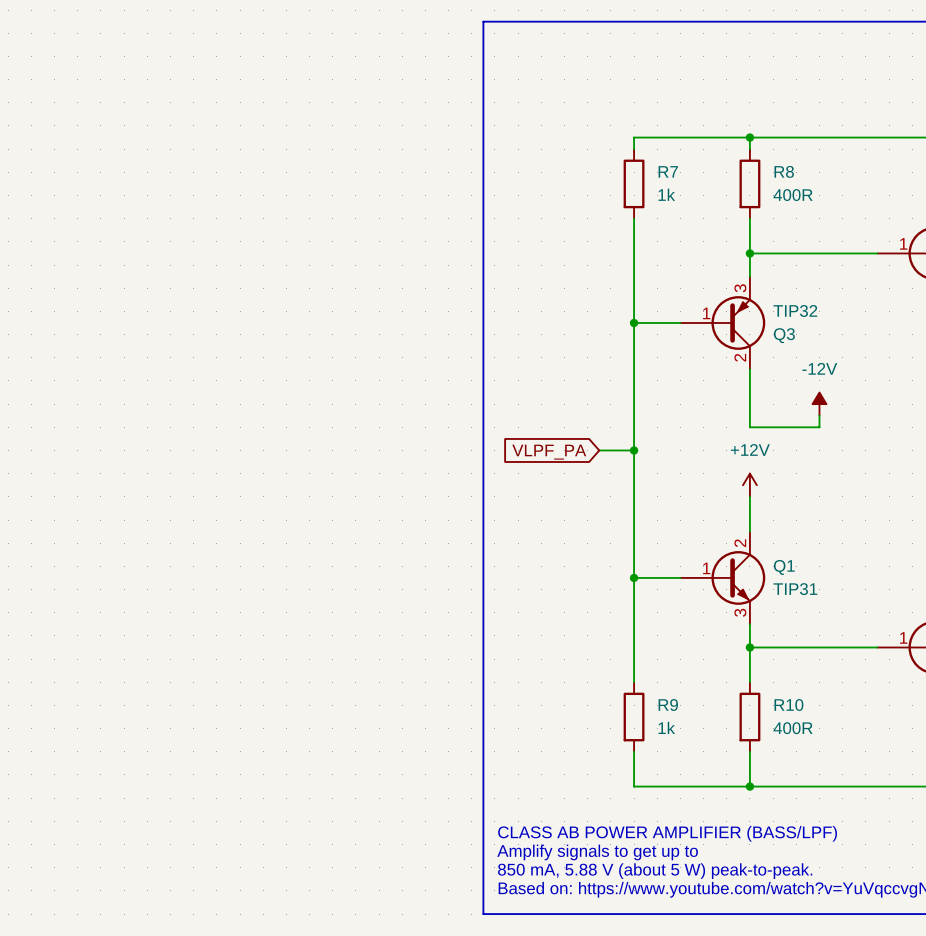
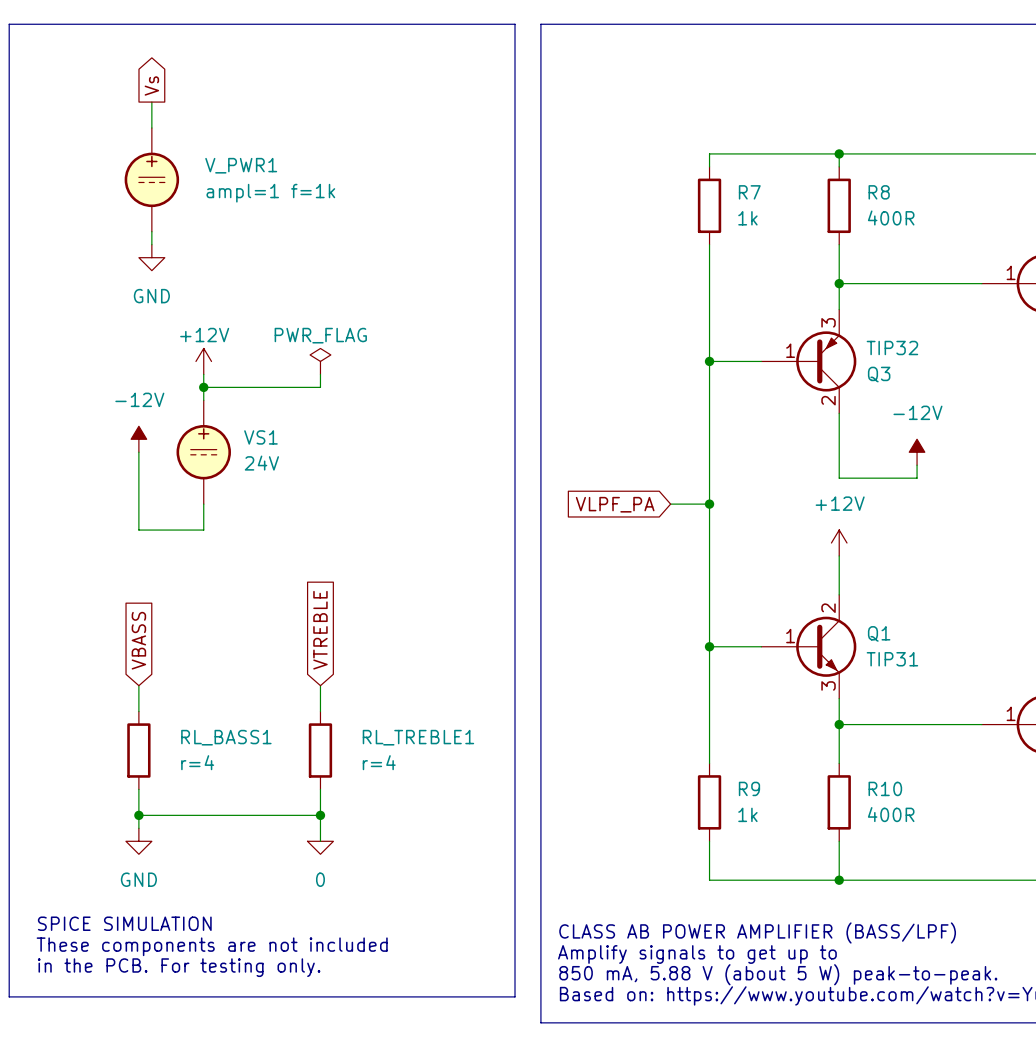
line: none -> (9, 24) (515, 24) (515, 996) (9, 996) (9, 24)
global label: none -> Vs (151, 85)
wire: none -> (151, 102) (151, 128)
V_PWR1: none -> ampl=1 f=1k (151, 179)
wire: none -> (151, 231) (151, 244)
power symbol: none -> GND (151, 257)
power symbol: none -> +12V (203, 361)
power symbol: none -> PWR_FLAG (320, 361)
wire: none -> (203, 374) (203, 400)
wire: none -> (320, 374) (320, 387) (203, 387)
junction: none -> (203, 387)
power symbol: none -> -12V (138, 439)
wire: none -> (138, 452) (138, 530) (203, 530) (203, 504)
VS1: none -> 24V (203, 452)
global label: none -> VTREBLE (320, 630)
global label: none -> VBASS (138, 640)
wire: none -> (138, 685) (138, 711)
wire: none -> (320, 685) (320, 711)
RL_BASS1: none -> r=4 (138, 750)
RL_TREBLE1: none -> r=4 (320, 750)
wire: none -> (138, 789) (138, 828)
wire: none -> (320, 789) (320, 841)
wire: none -> (138, 815) (320, 815)
junction: none -> (138, 815)
junction: none -> (320, 815)
power symbol: none -> GND (138, 841)
power symbol: none -> 0 (320, 847)
text: none -> SPICE SIMULATION (124, 923)
text: none -> These components are not included (212, 946)
text: none -> in the PCB. For testing only. (179, 967)

